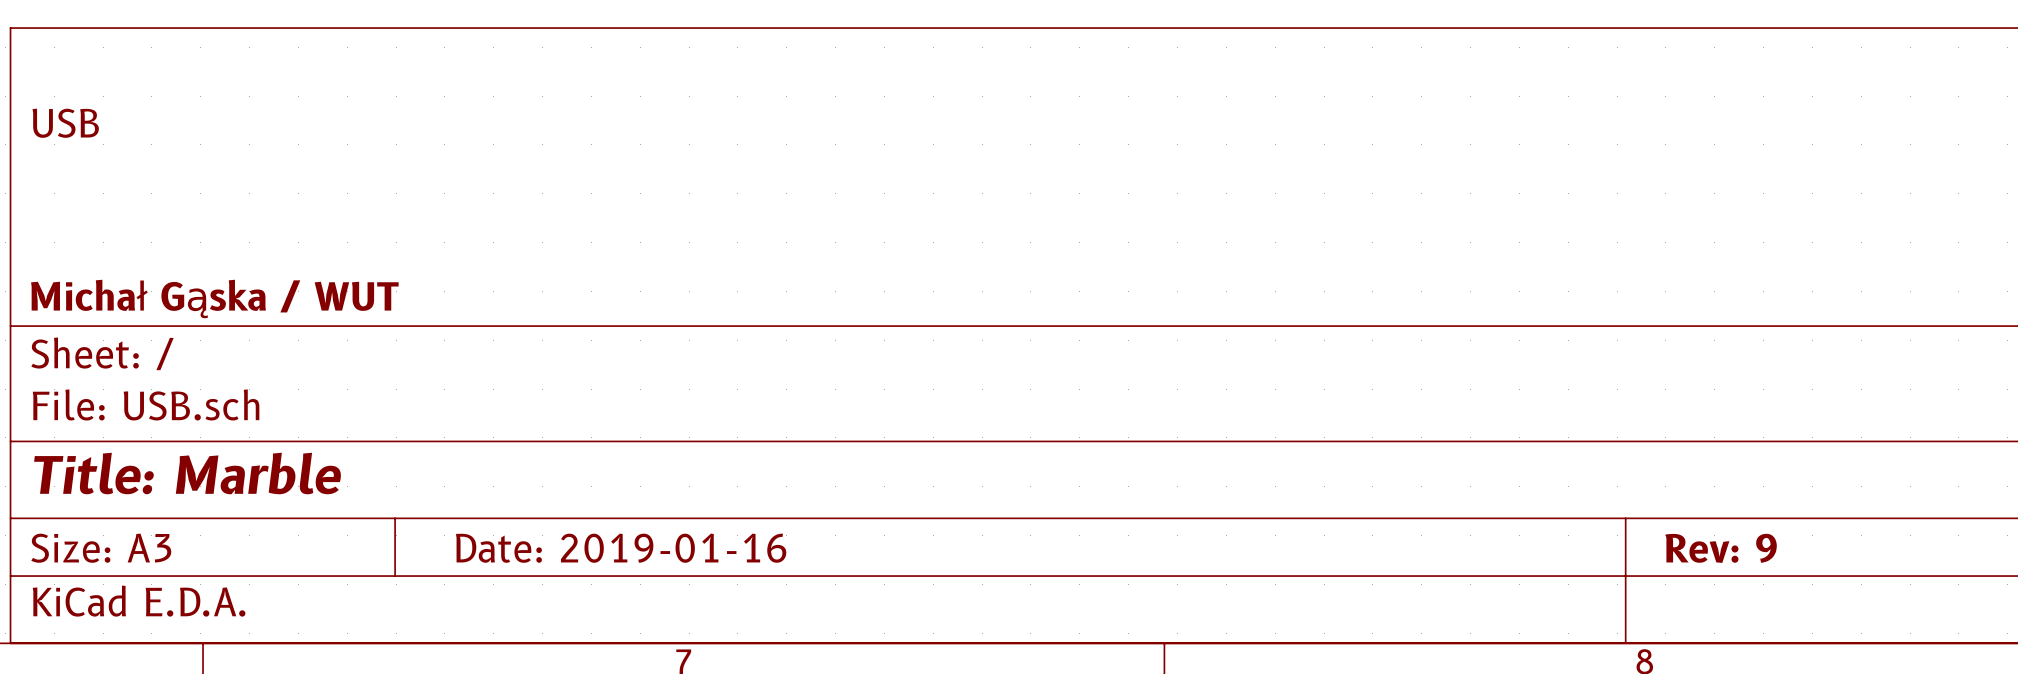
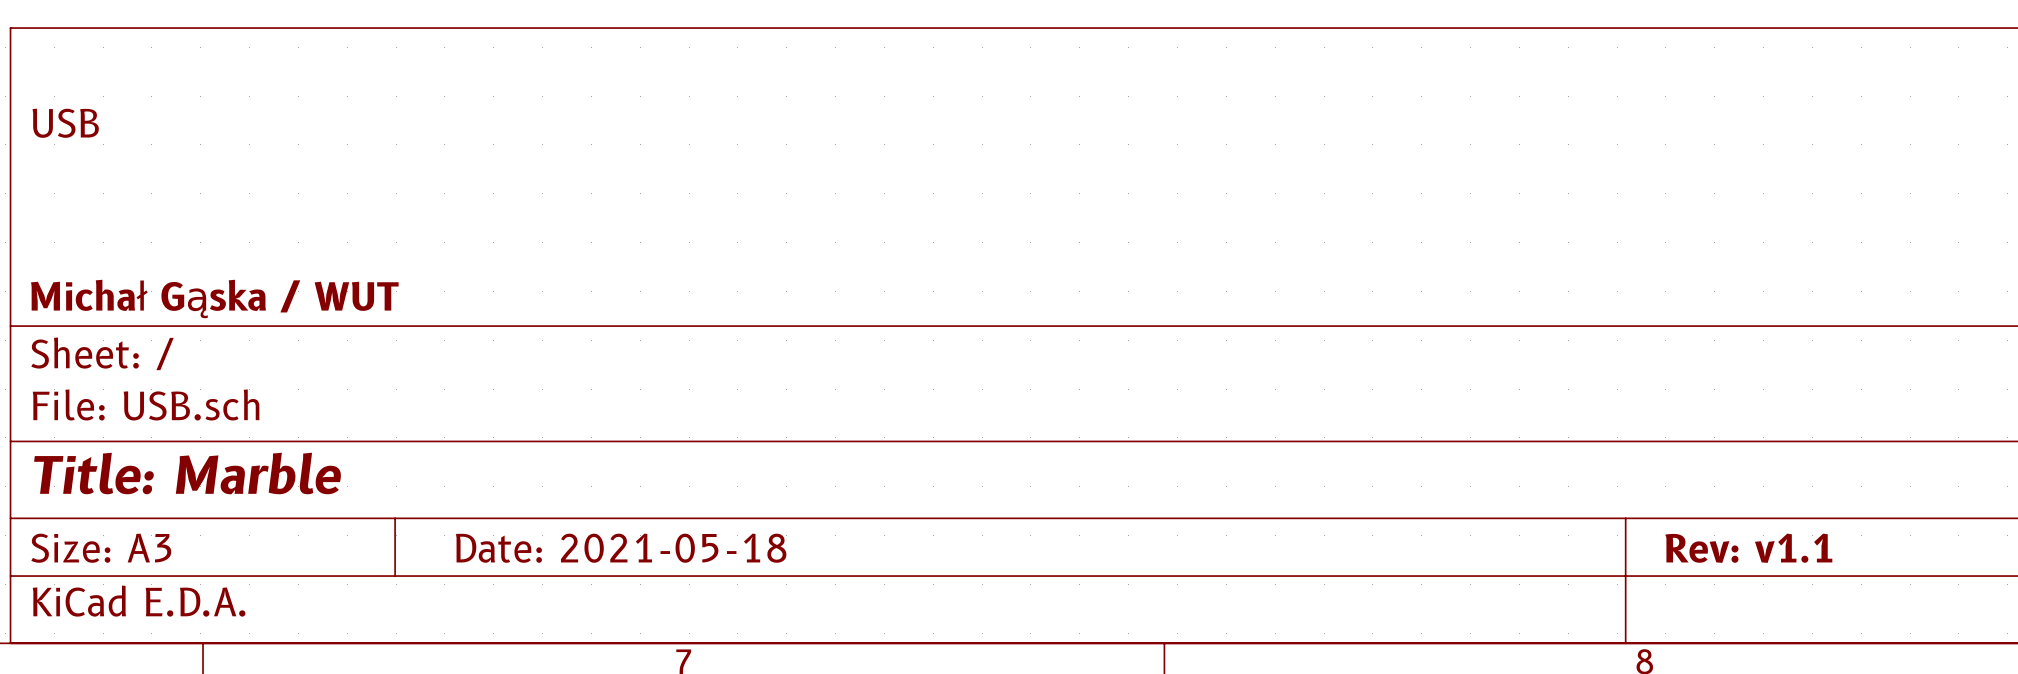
title block: Date: 2019-01-16 (621, 548) -> Date: 2021-05-18 (621, 548)
title block: Rev: 9 (1721, 548) -> Rev: v1.1 (1749, 548)

